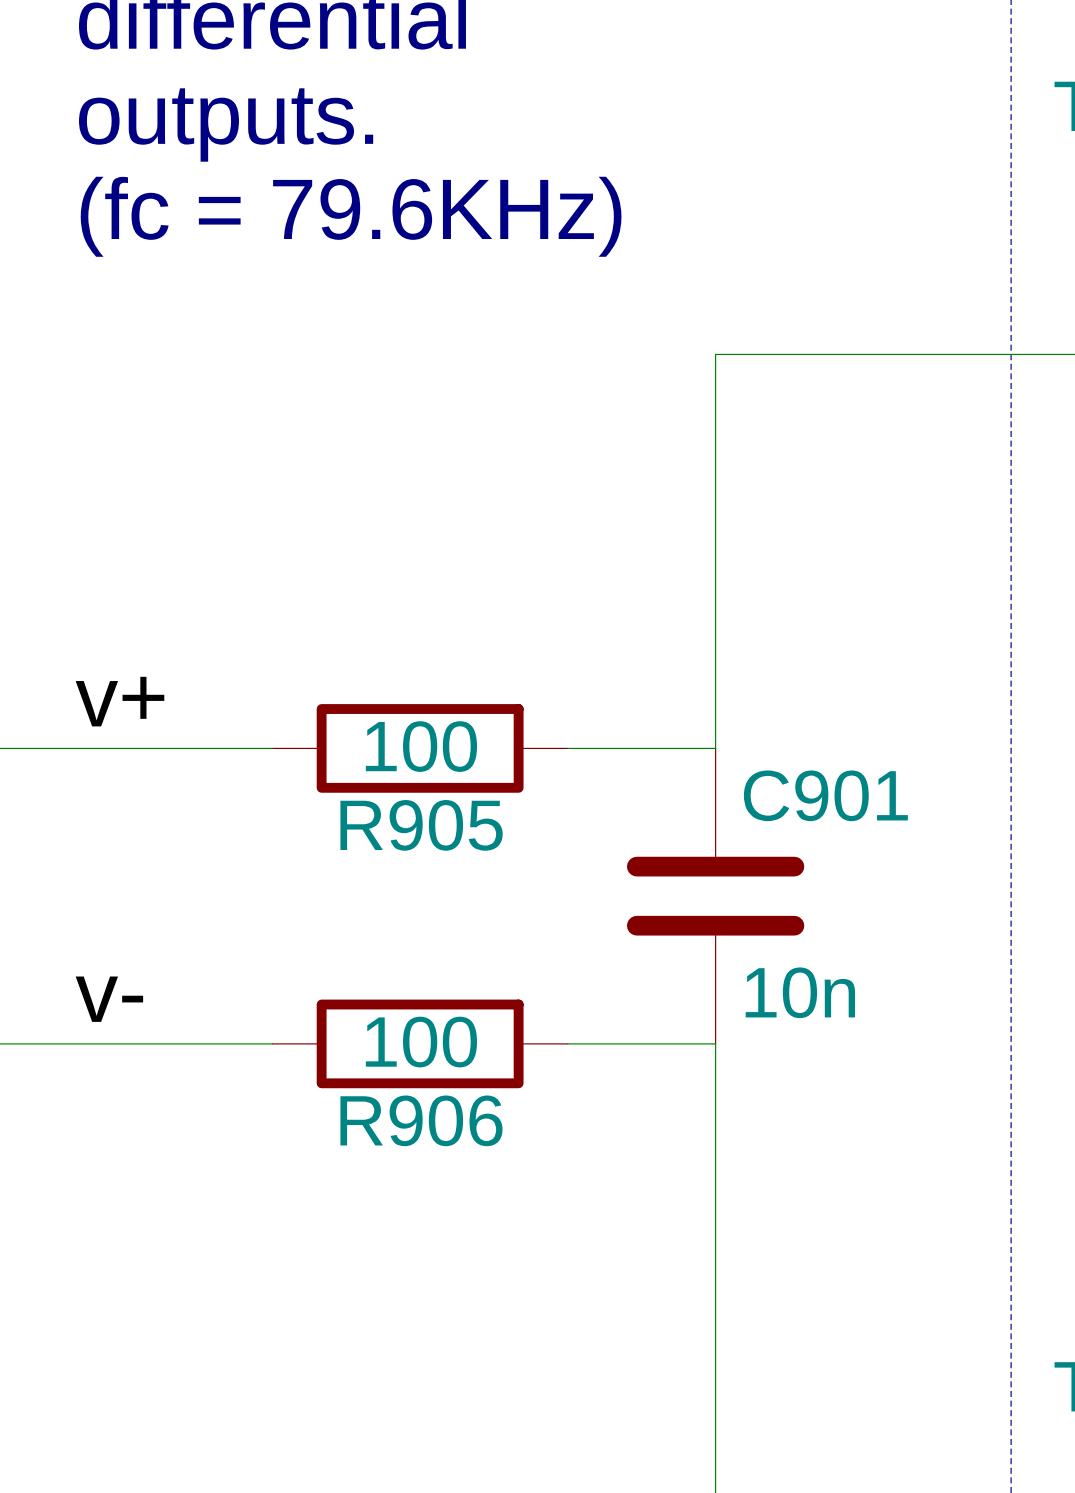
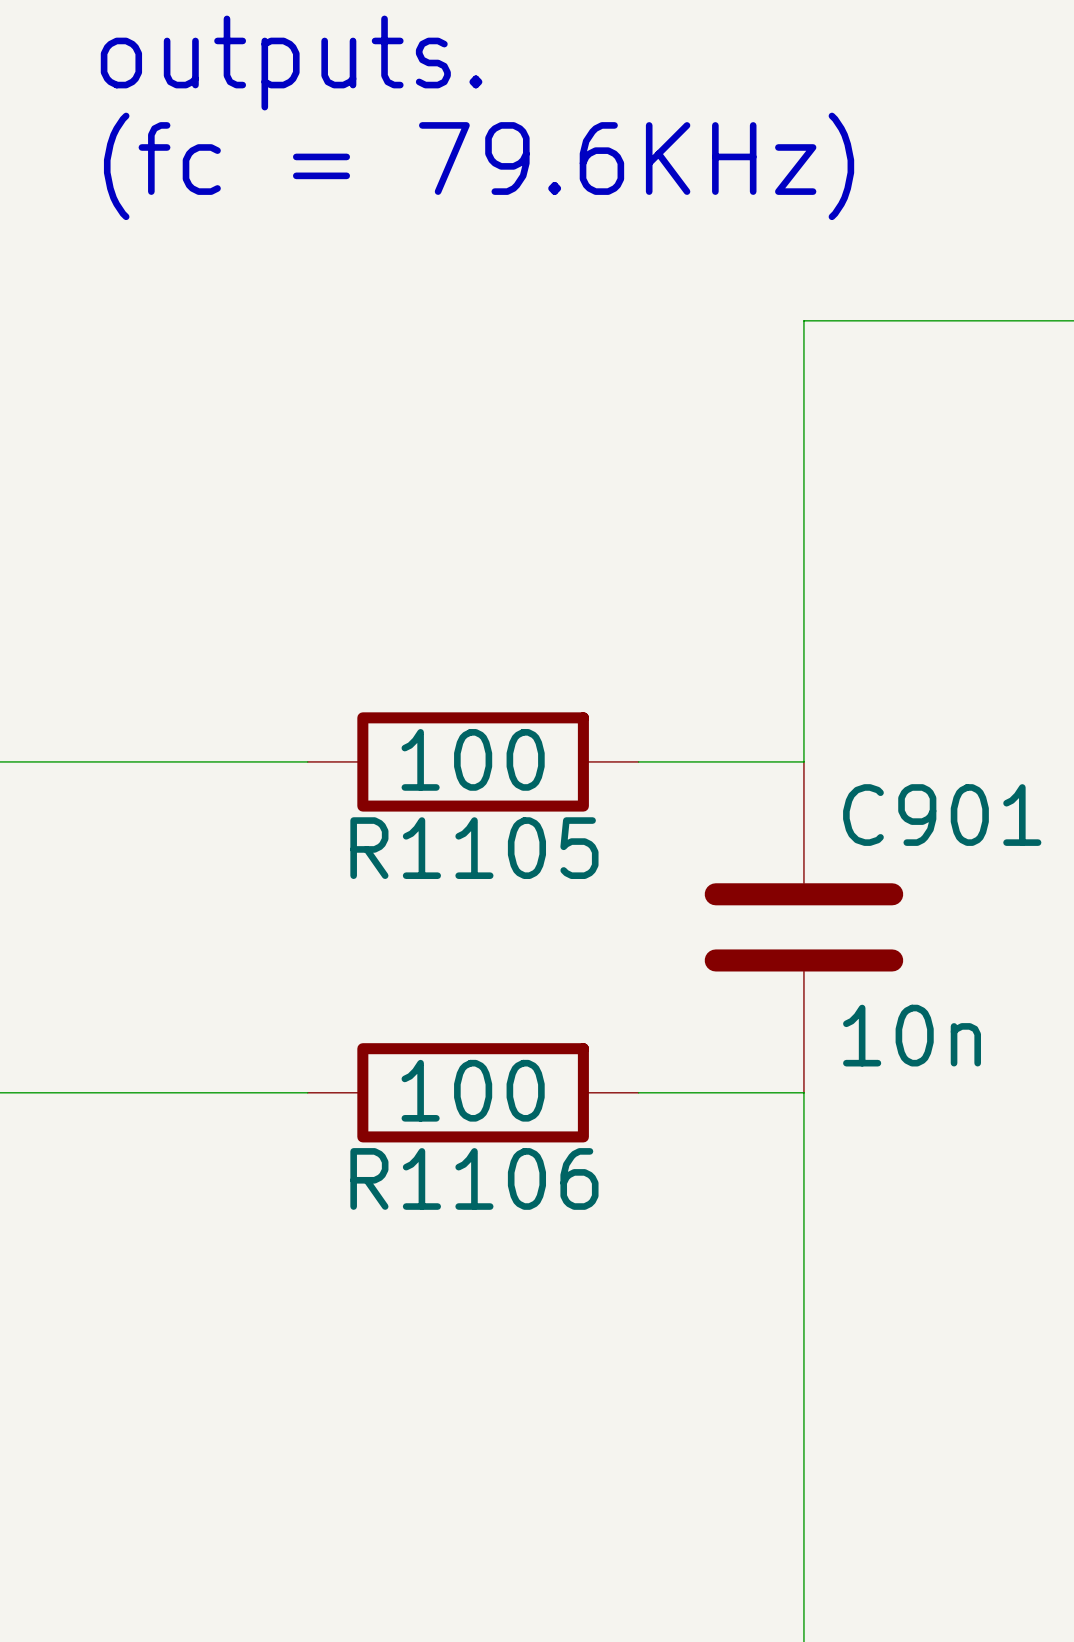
label: v+ (119, 701) -> none
R905 name: R905 (421, 825) -> R1105 (474, 848)
label: v- (109, 999) -> none
R906 name: R906 (421, 1120) -> R1106 (474, 1178)

